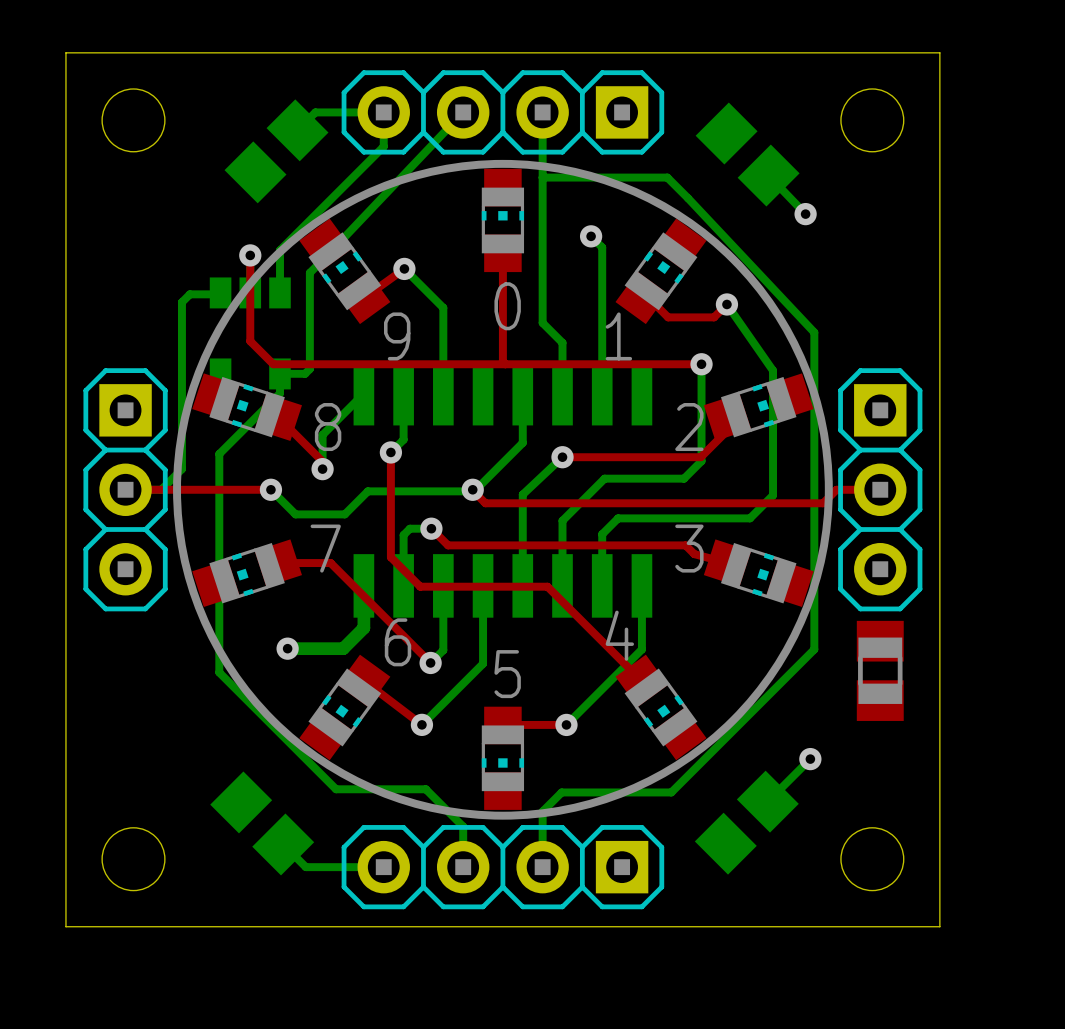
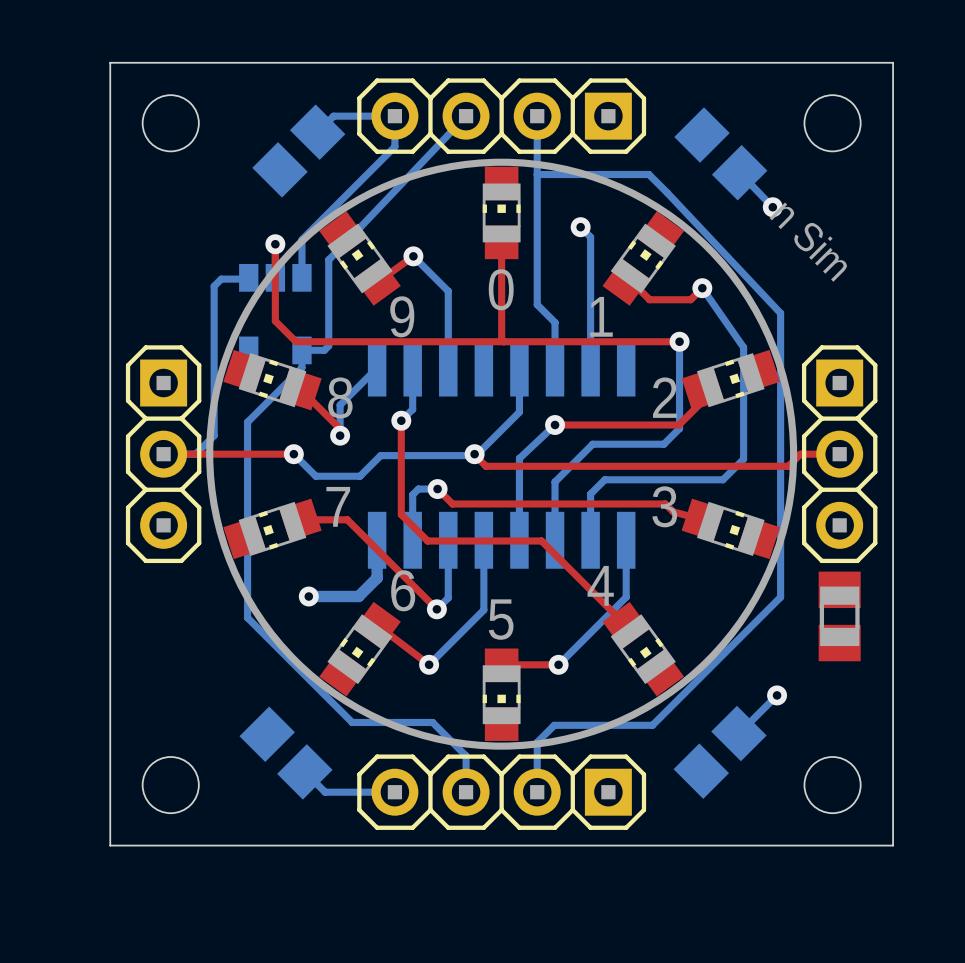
text: none -> n Sim (808, 242)

